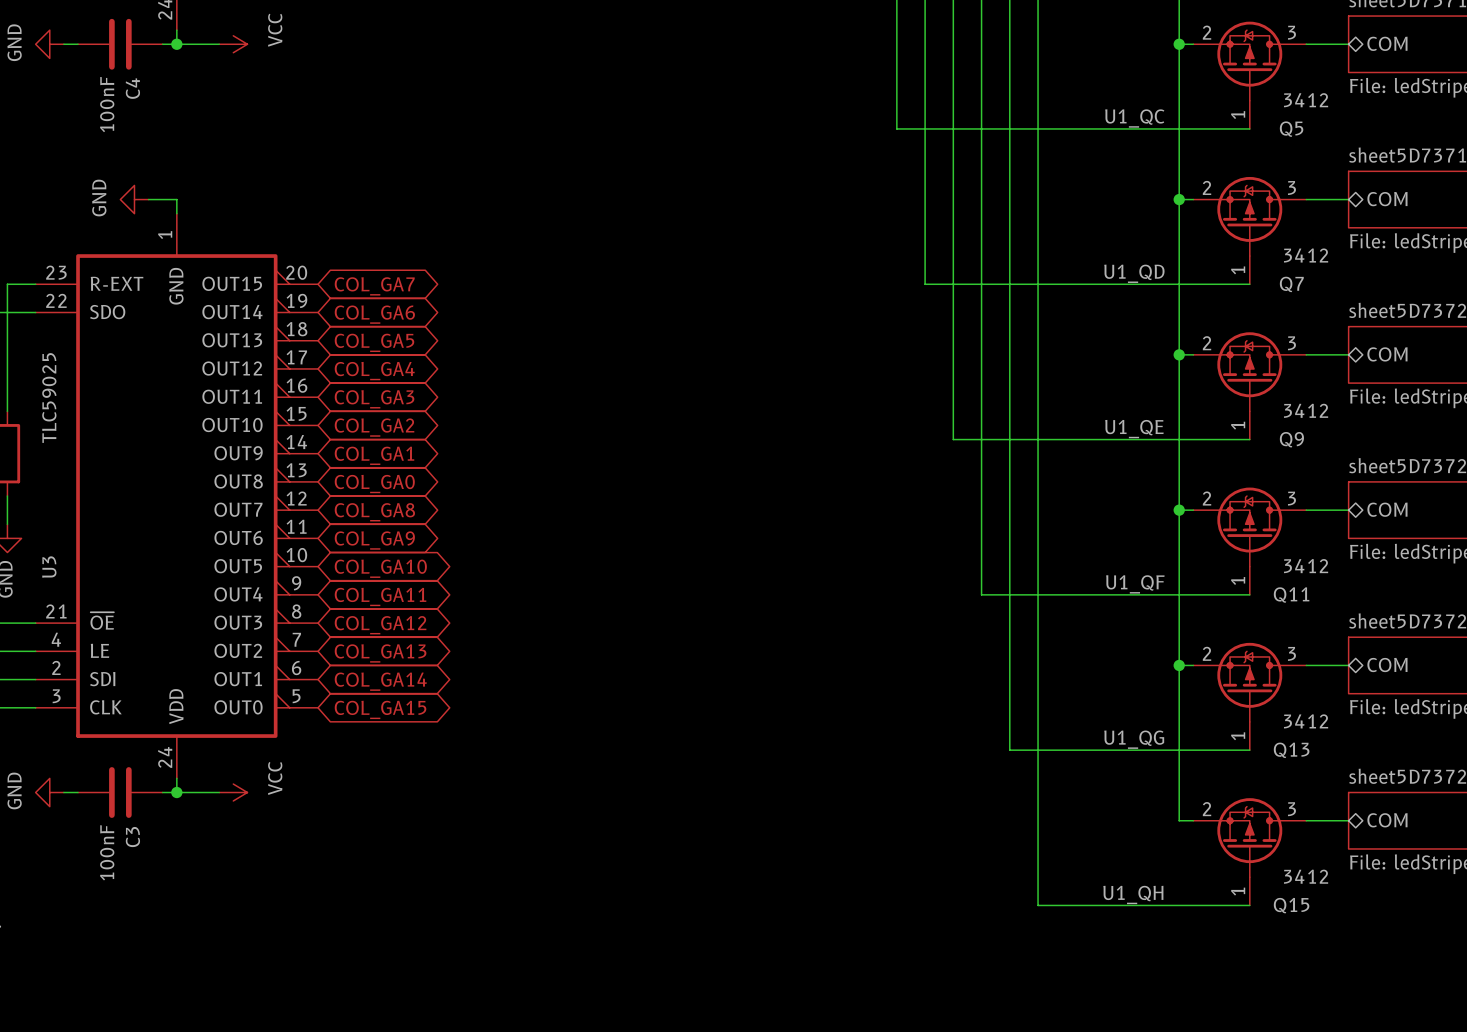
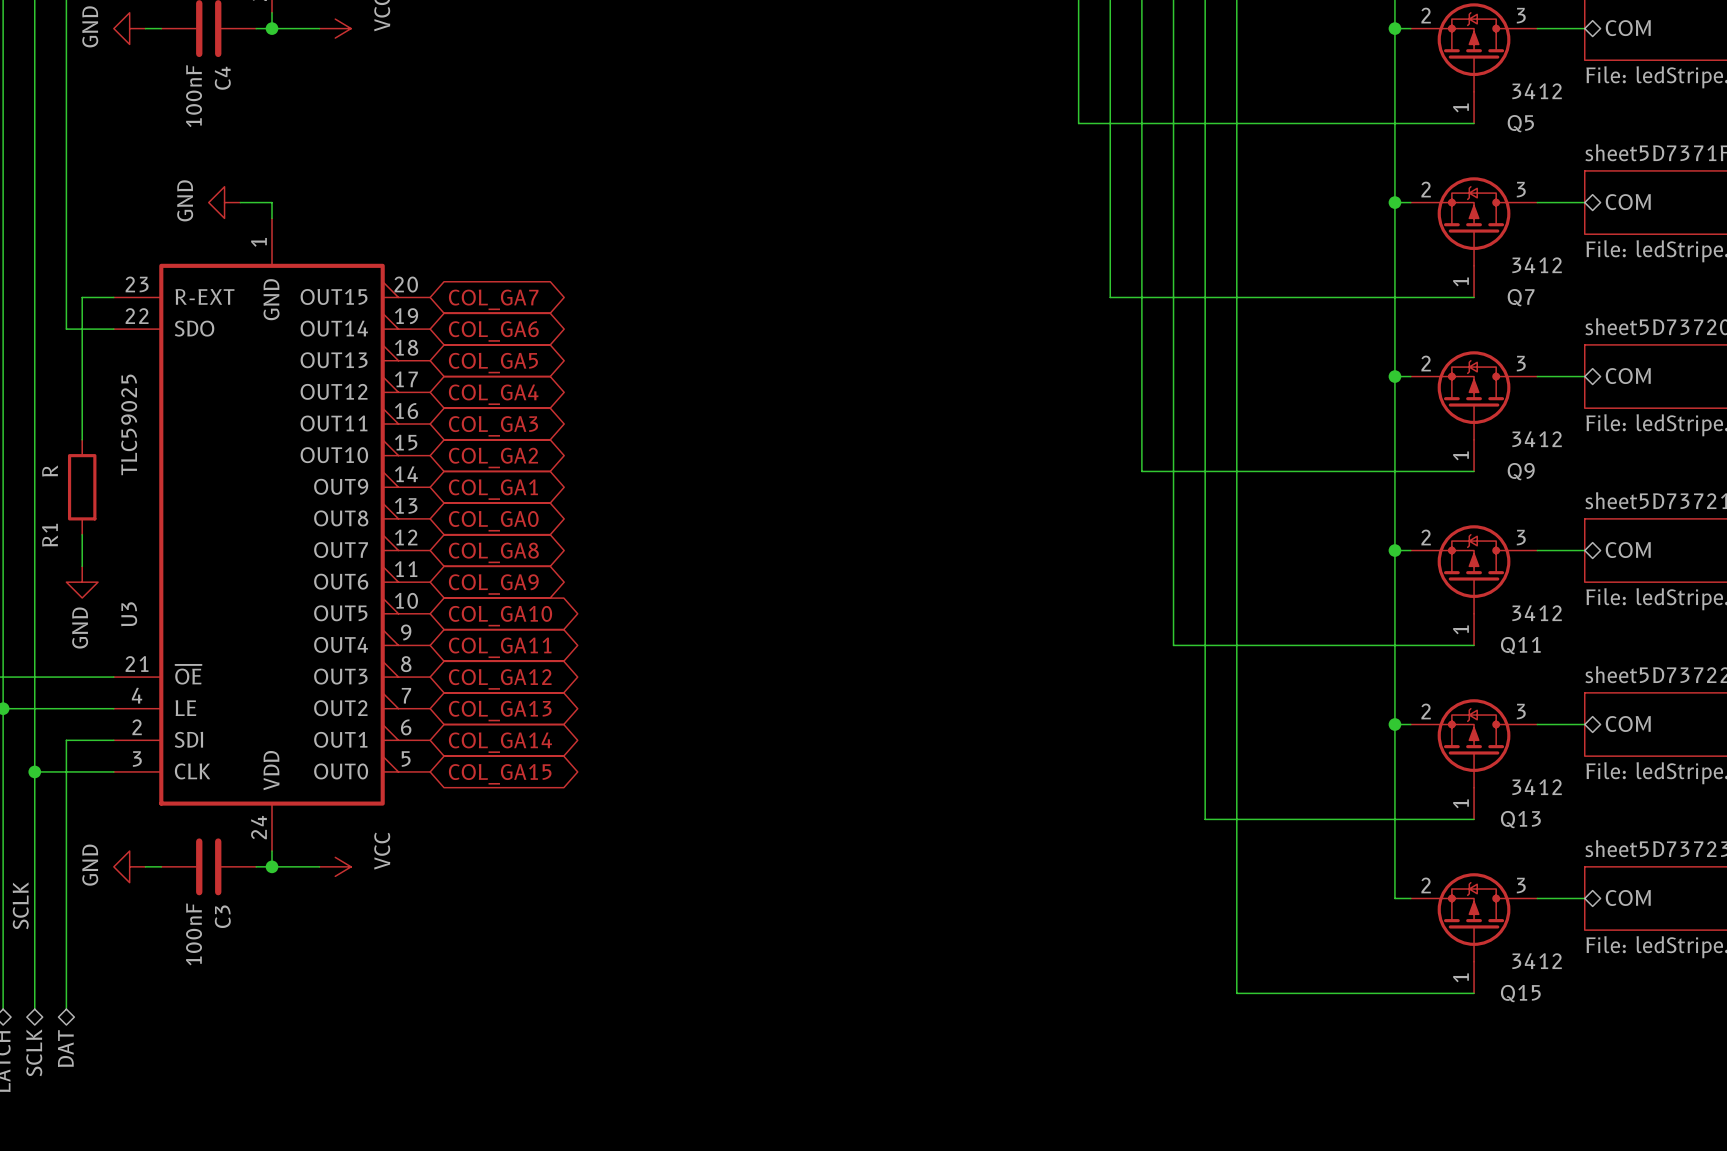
label: U1_QC (1134, 118) -> none
label: U1_QD (1134, 273) -> none
label: U1_QE (1134, 429) -> none
label: U1_QF (1135, 584) -> none
label: U1_QG (1134, 739) -> none
label: U1_QH (1133, 894) -> none

